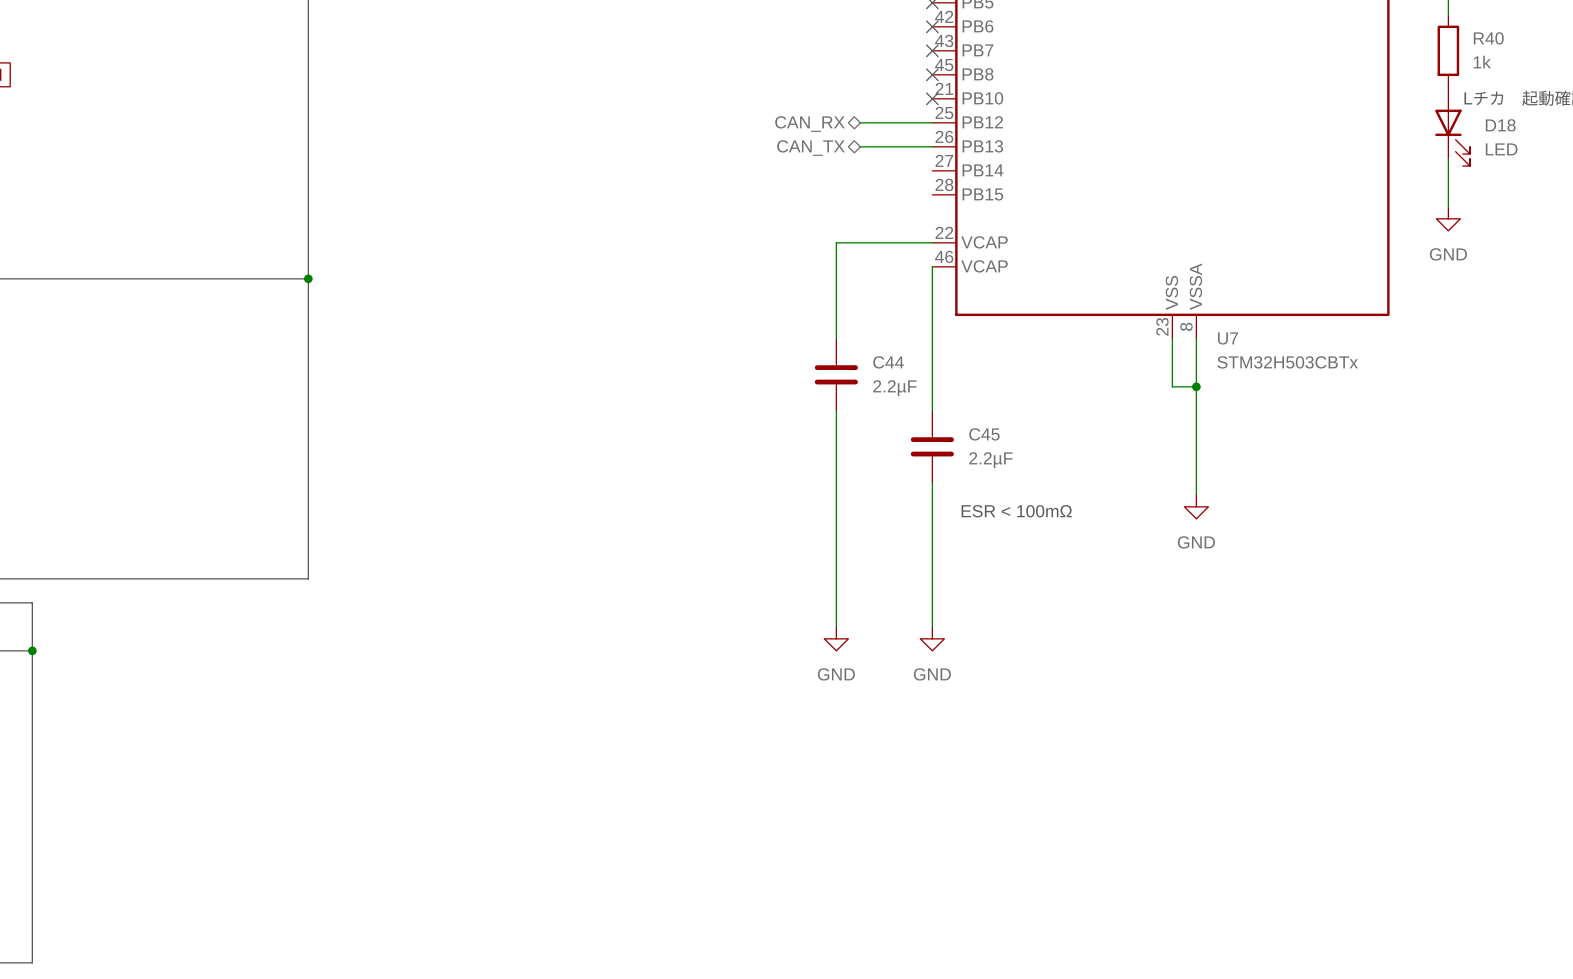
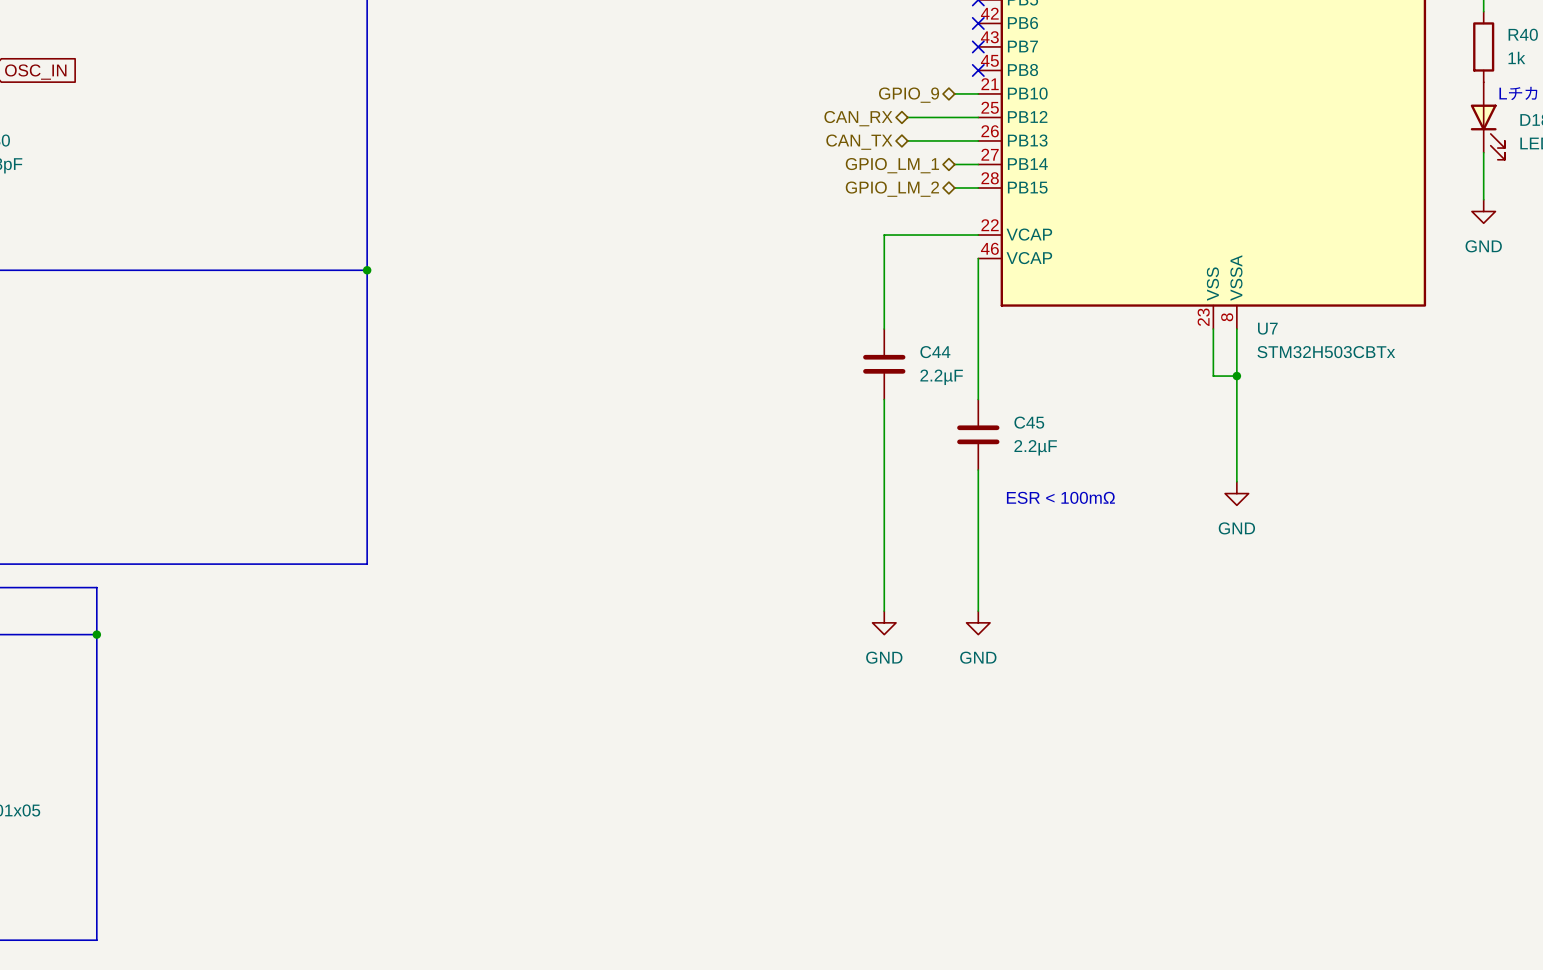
wire: none -> (954, 93) (978, 93)
no-connect mark: (932, 98) -> none
hierarchical label: none -> GPIO_9 (909, 95)
wire: none -> (954, 164) (978, 164)
hierarchical label: none -> GPIO_LM_1 (892, 165)
wire: none -> (954, 187) (978, 187)
hierarchical label: none -> GPIO_LM_2 (892, 189)

